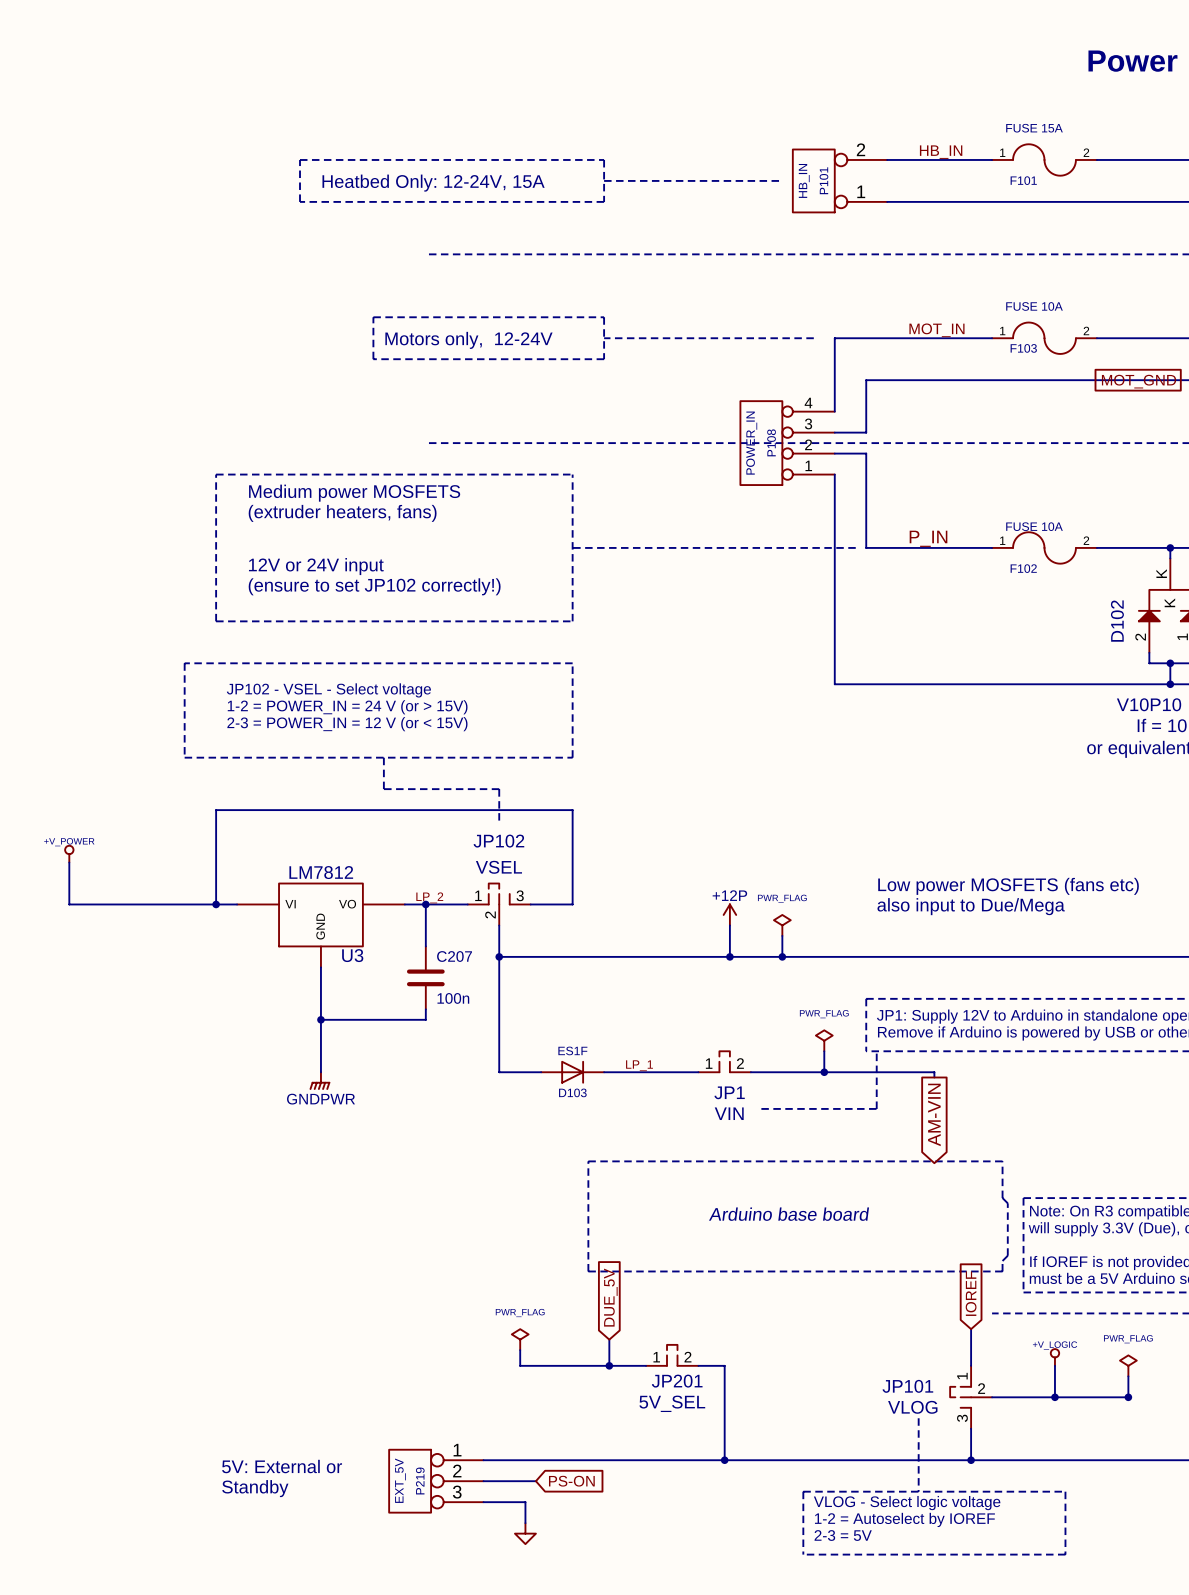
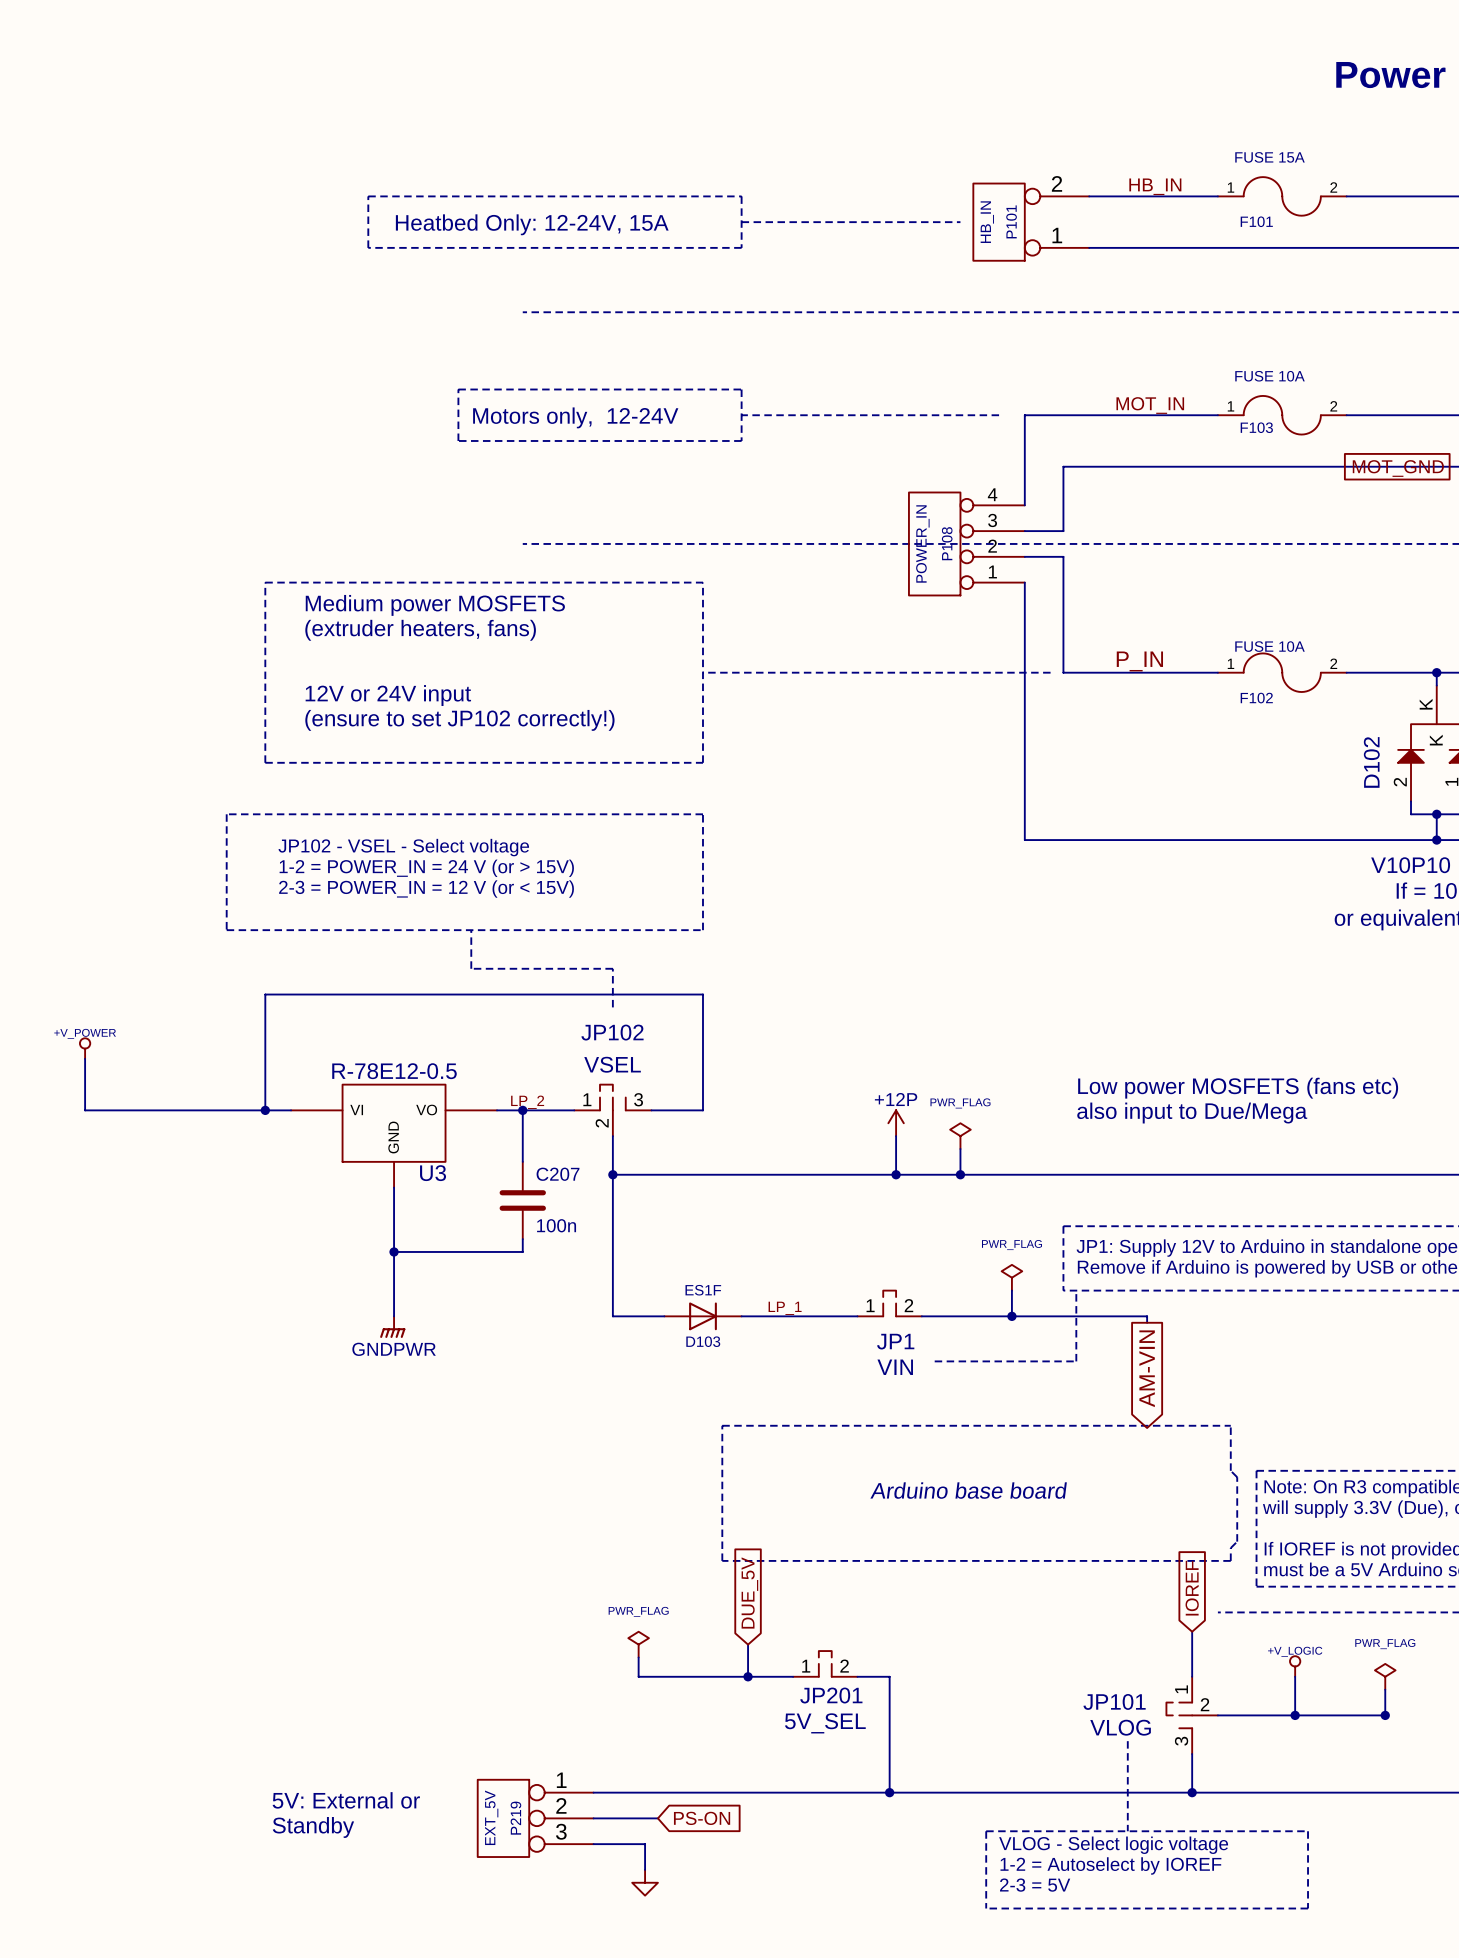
U3 value: LM7812 (321, 872) -> R-78E12-0.5 (394, 1071)

